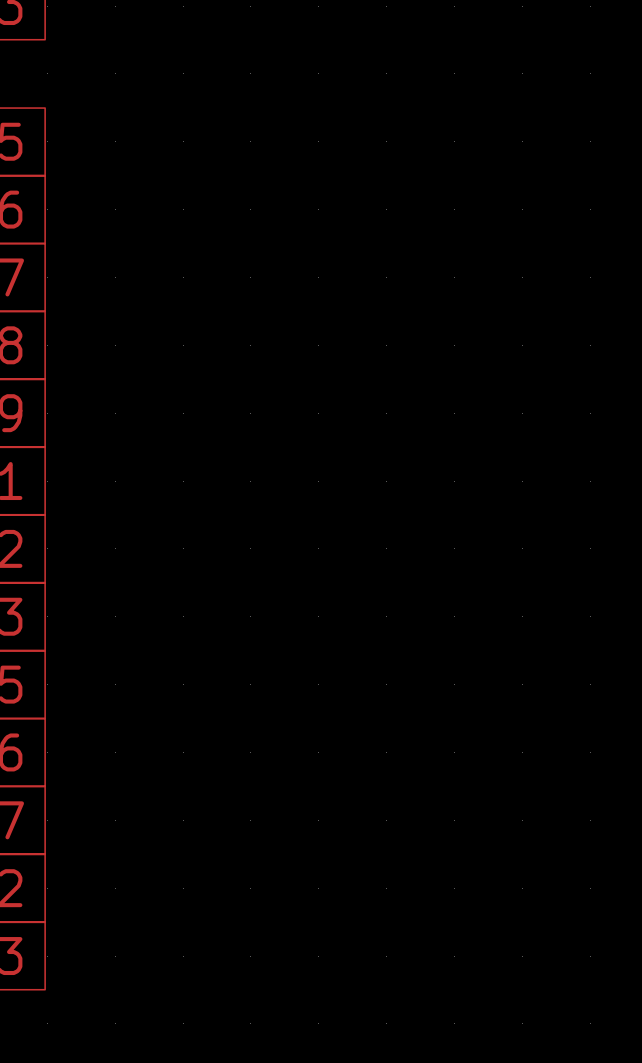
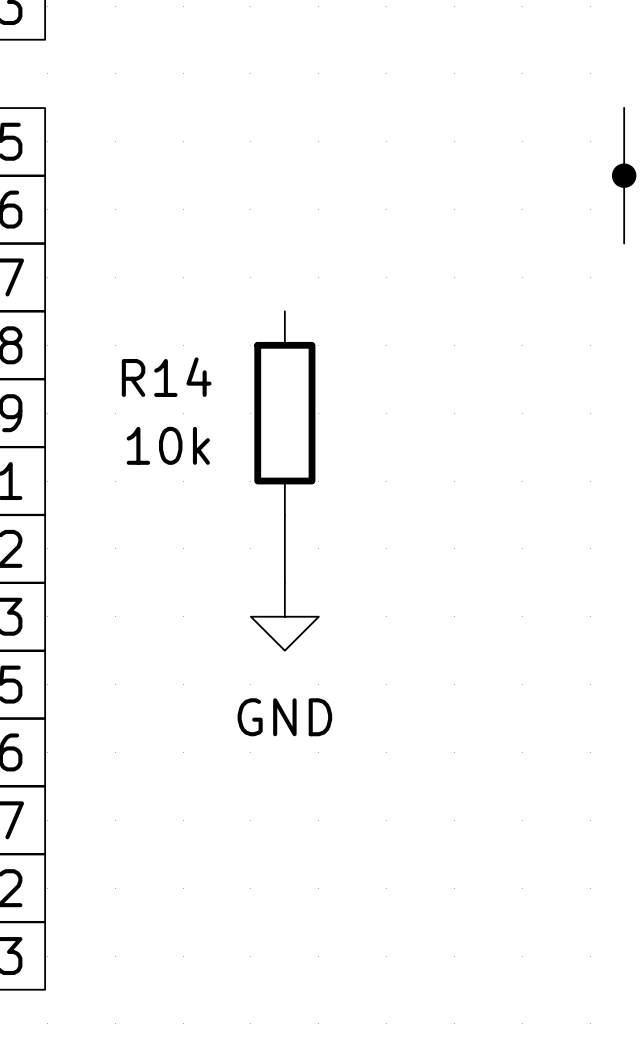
wire: none -> (624, 107) (624, 243)
junction: none -> (624, 175)
R14: none -> 10k (284, 413)
wire: none -> (284, 514) (284, 582)
power symbol: none -> GND (284, 616)

